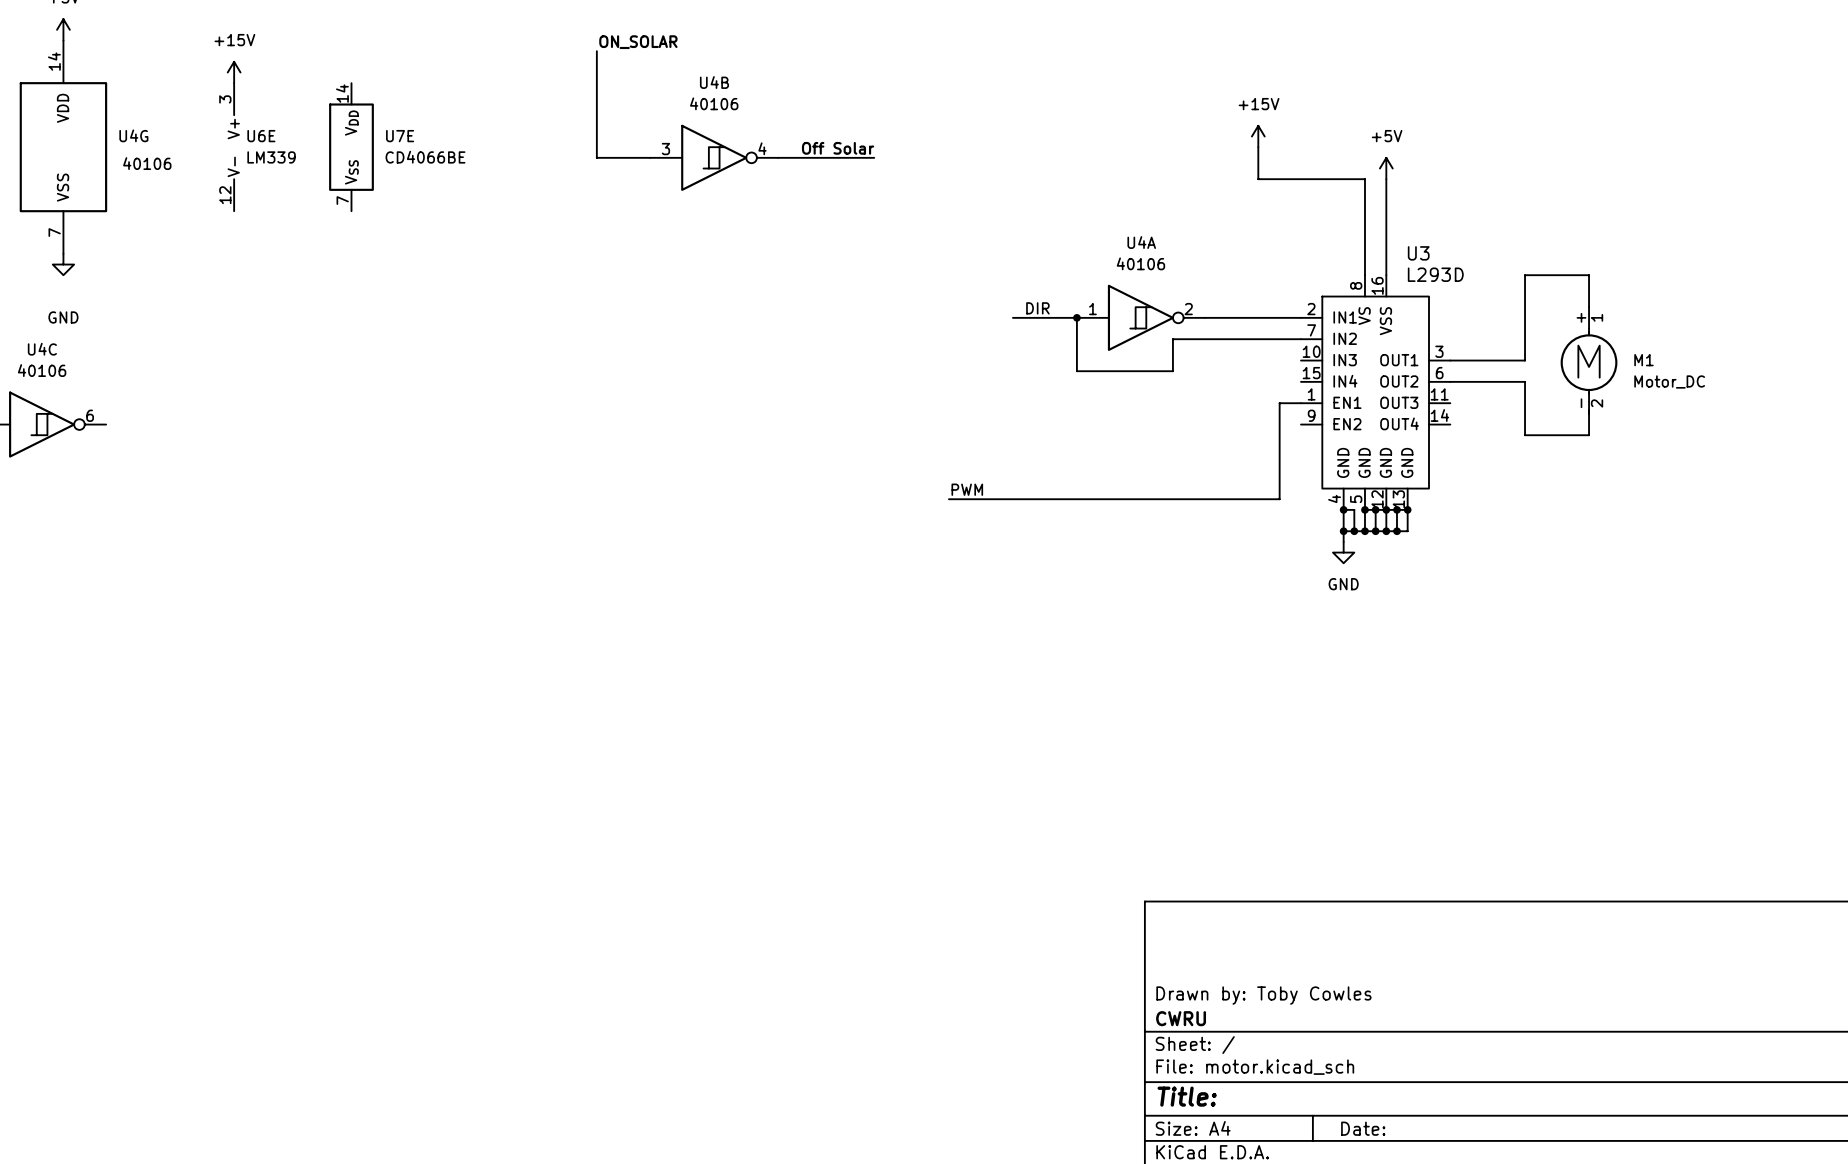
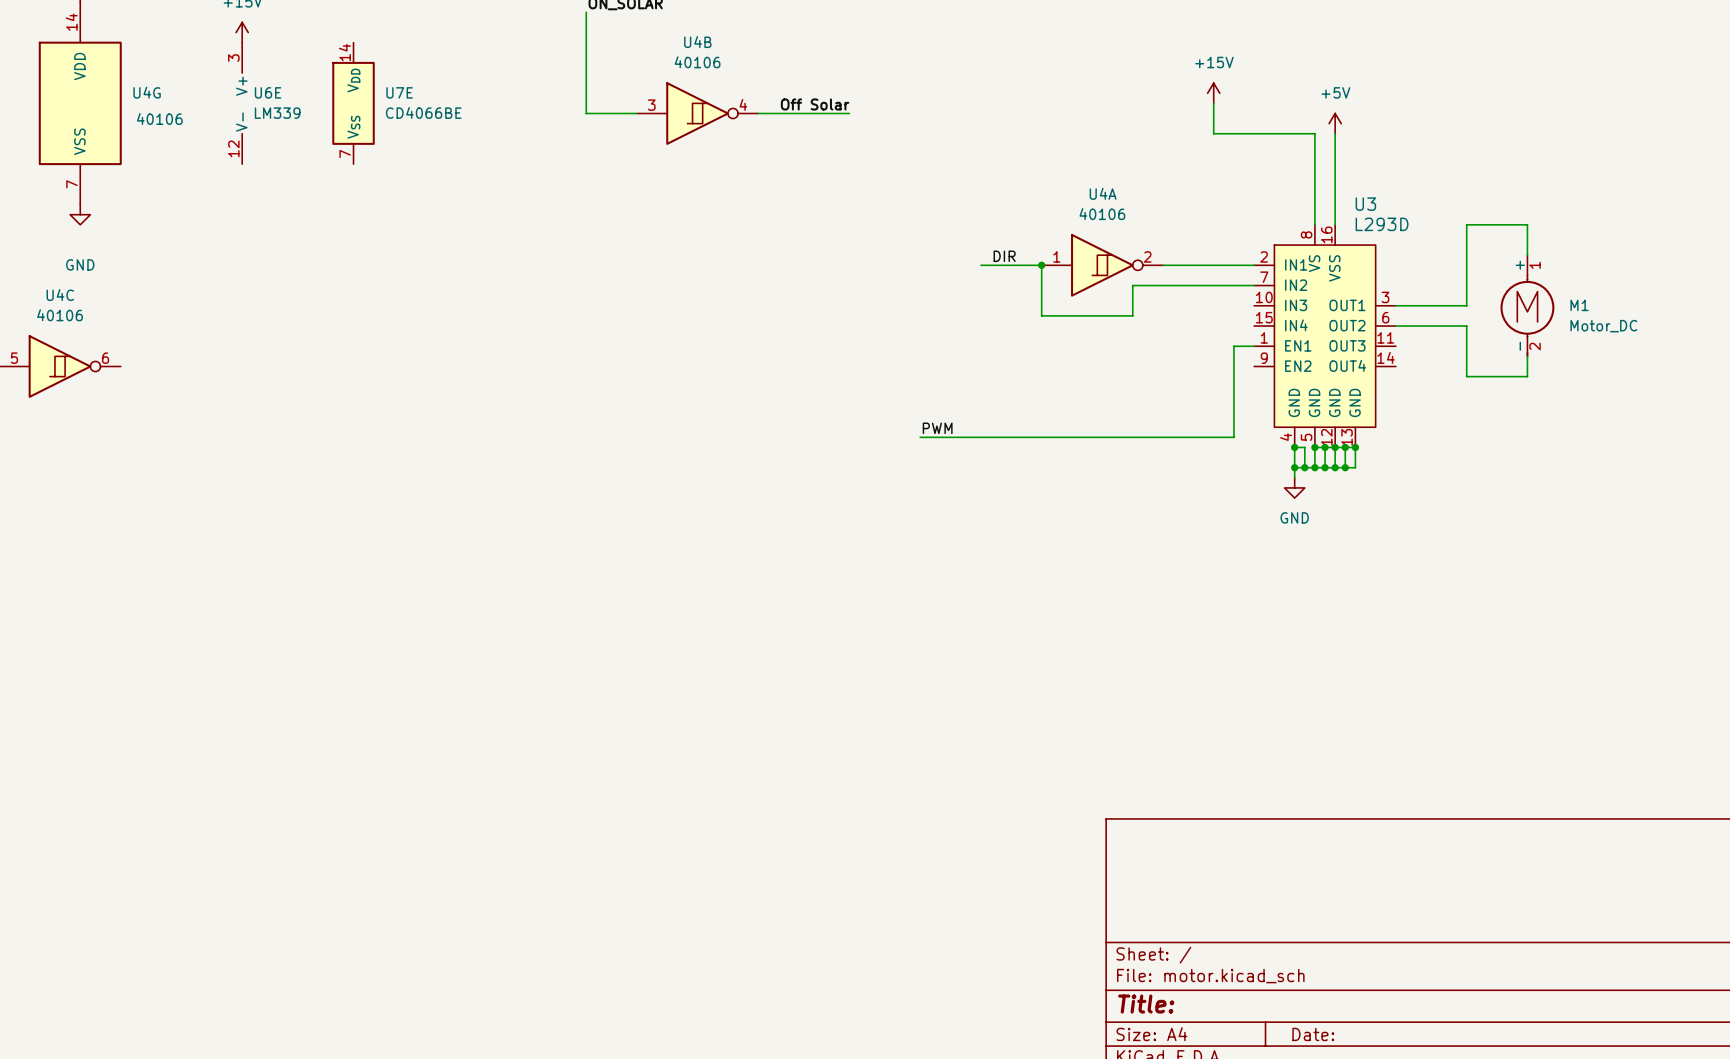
title block: Drawn by: Toby Cowles (1263, 995) -> none
title block: CWRU (1181, 1018) -> none

